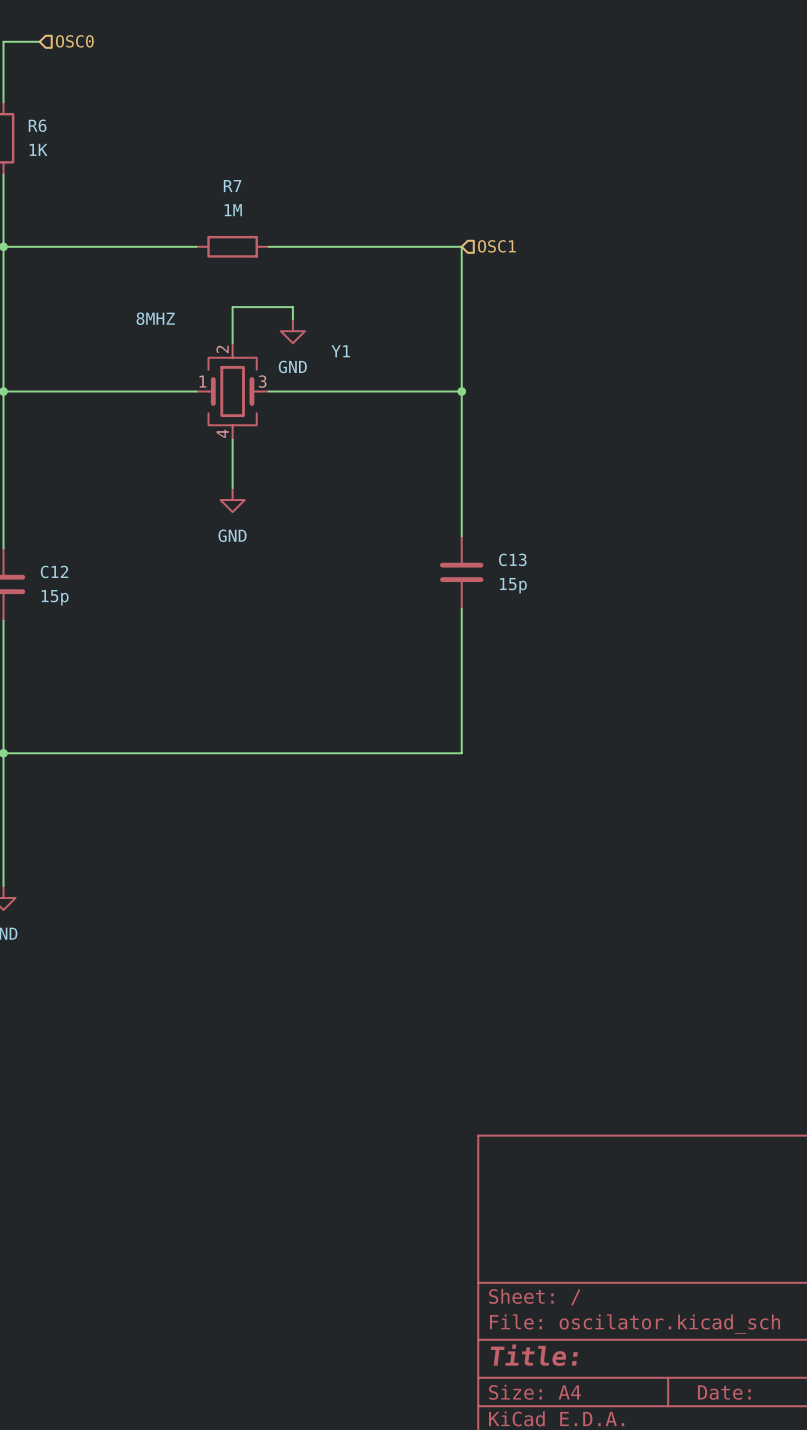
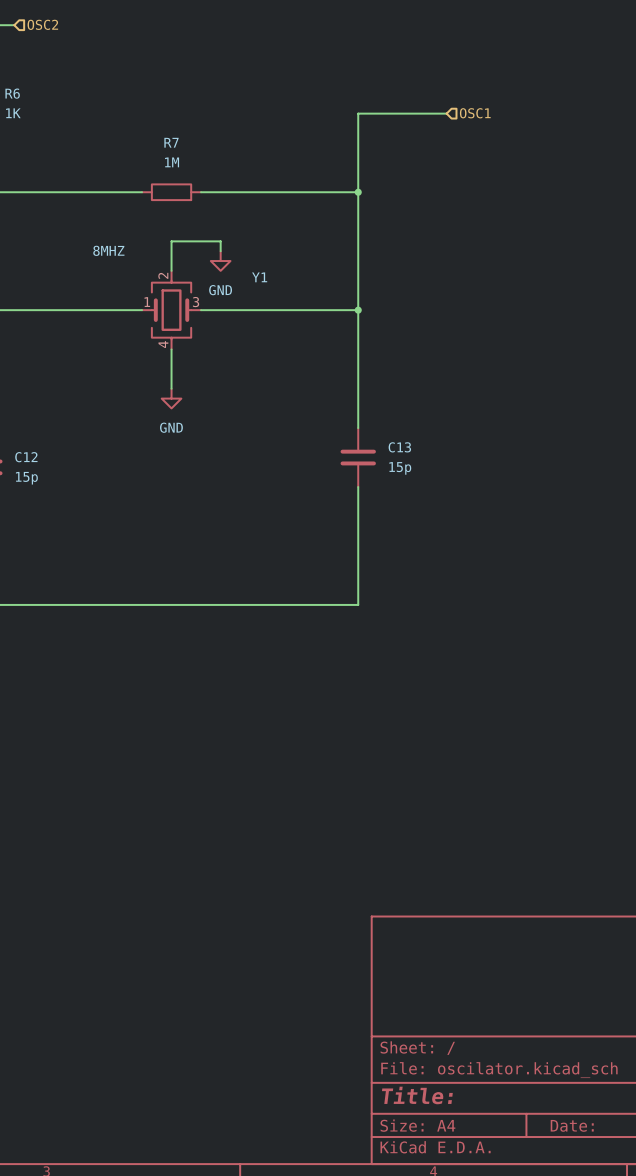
hierarchical label: OSC0 (74, 41) -> OSC2 (42, 24)
wire: none -> (446, 113) (358, 113) (358, 192)
junction: none -> (358, 192)
hierarchical label position: OSC1 (496, 246) -> OSC1 (475, 113)

